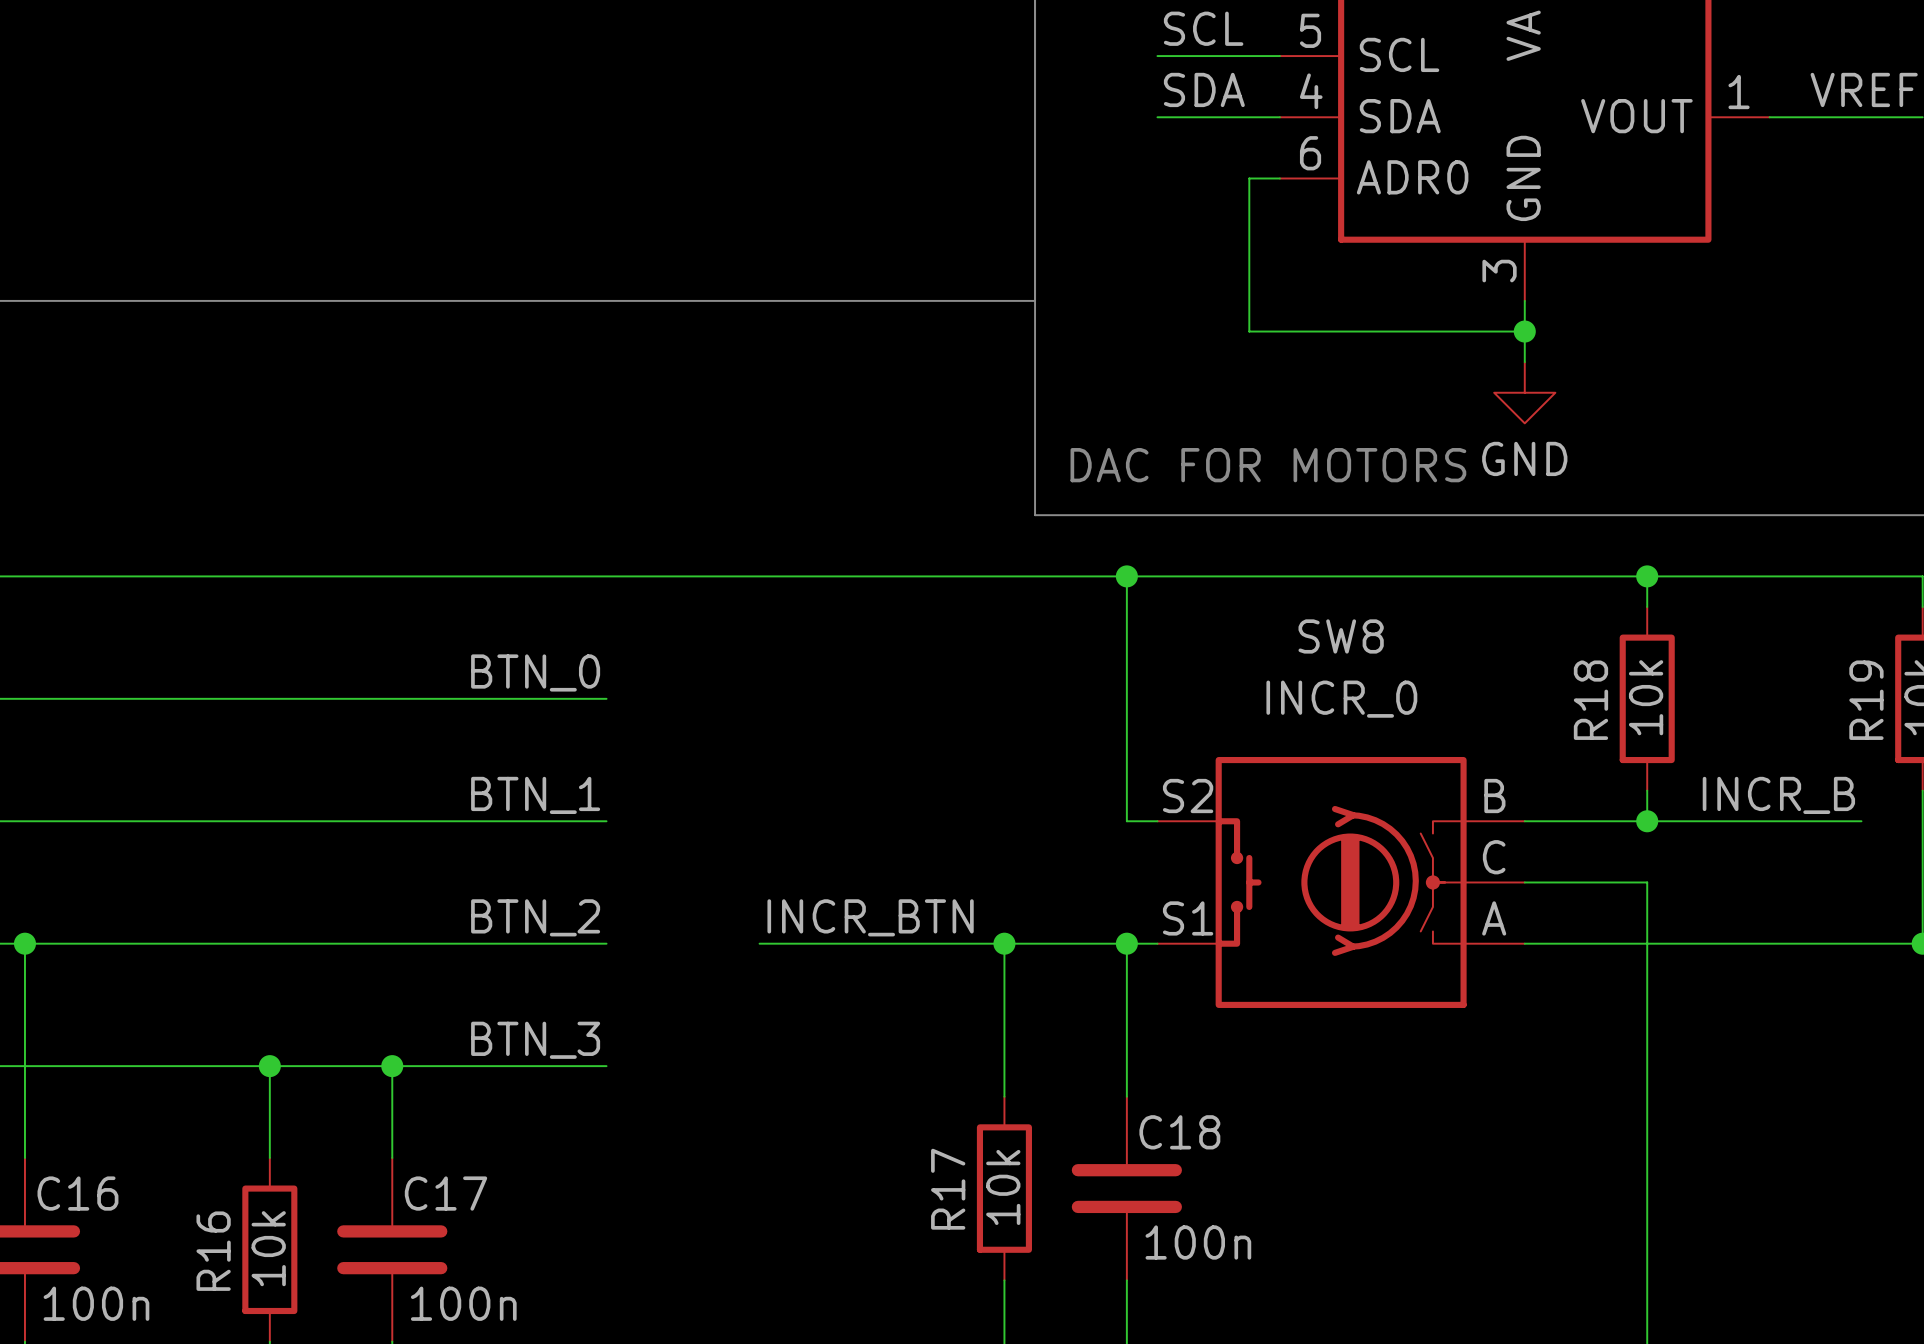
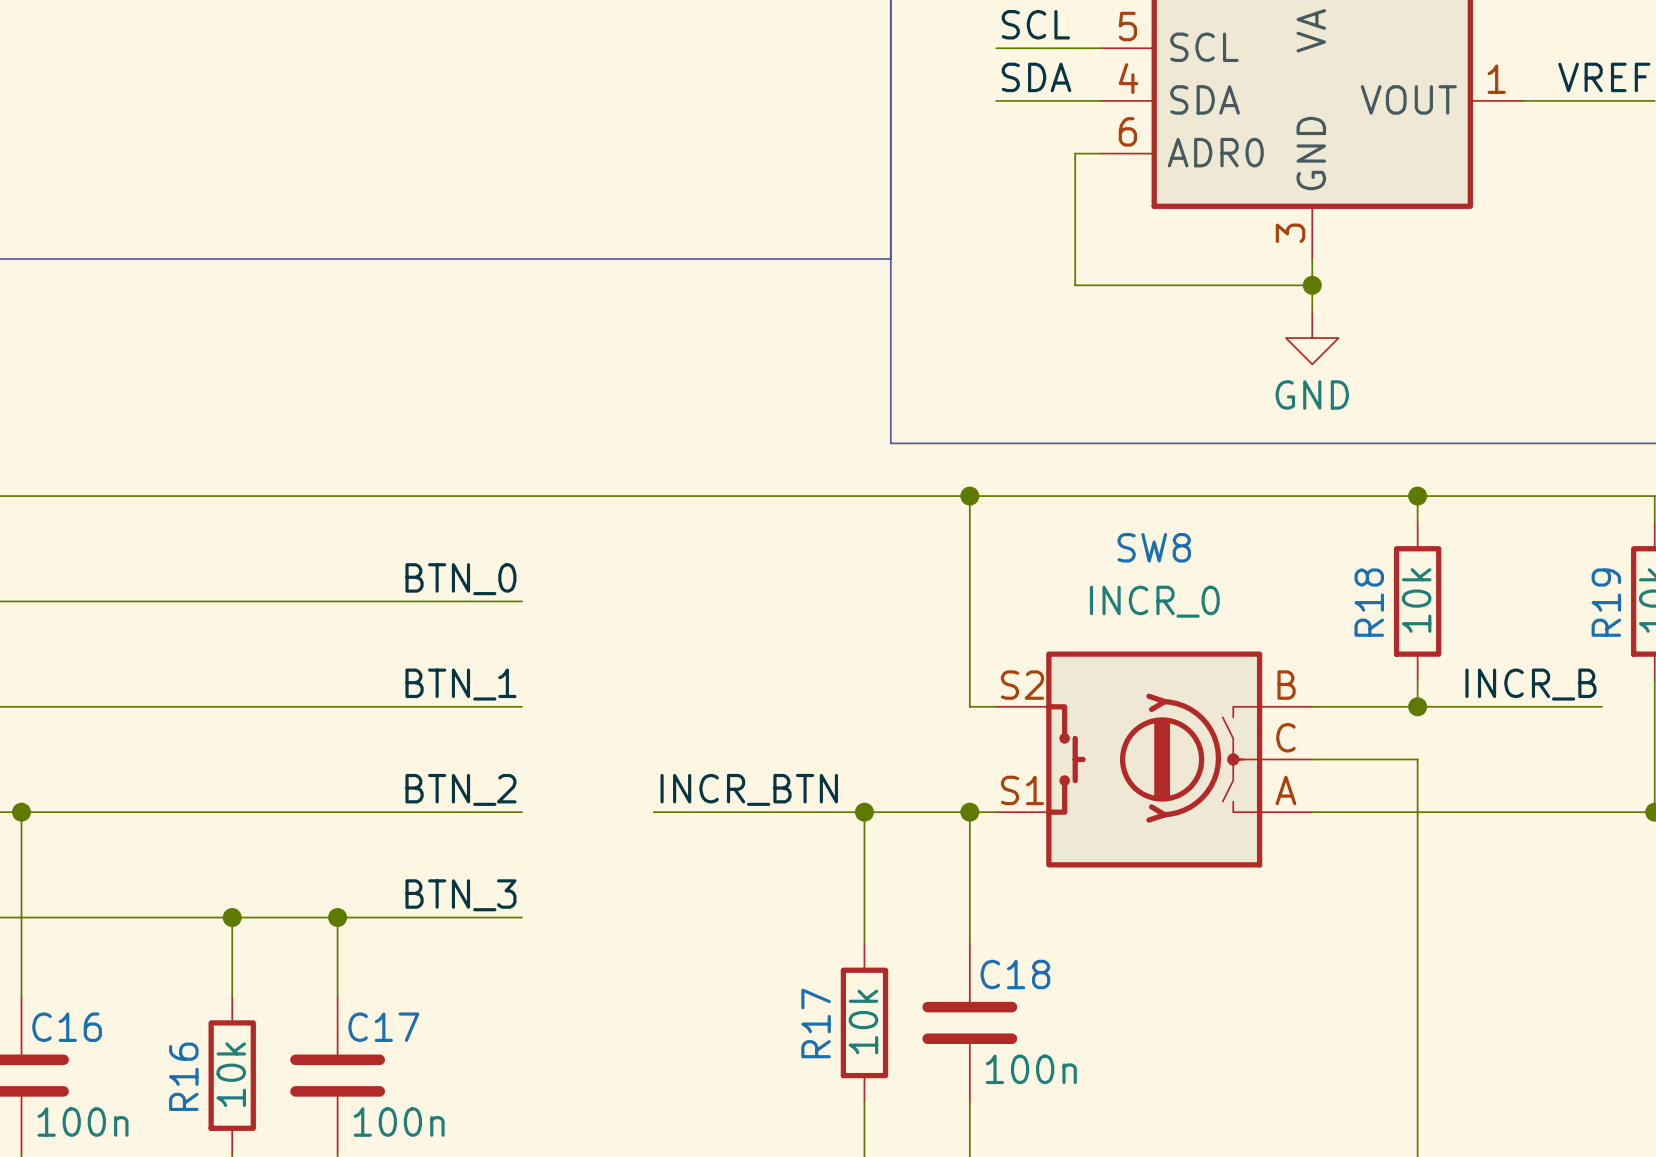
text: DAC FOR MOTORS (1268, 465) -> none

